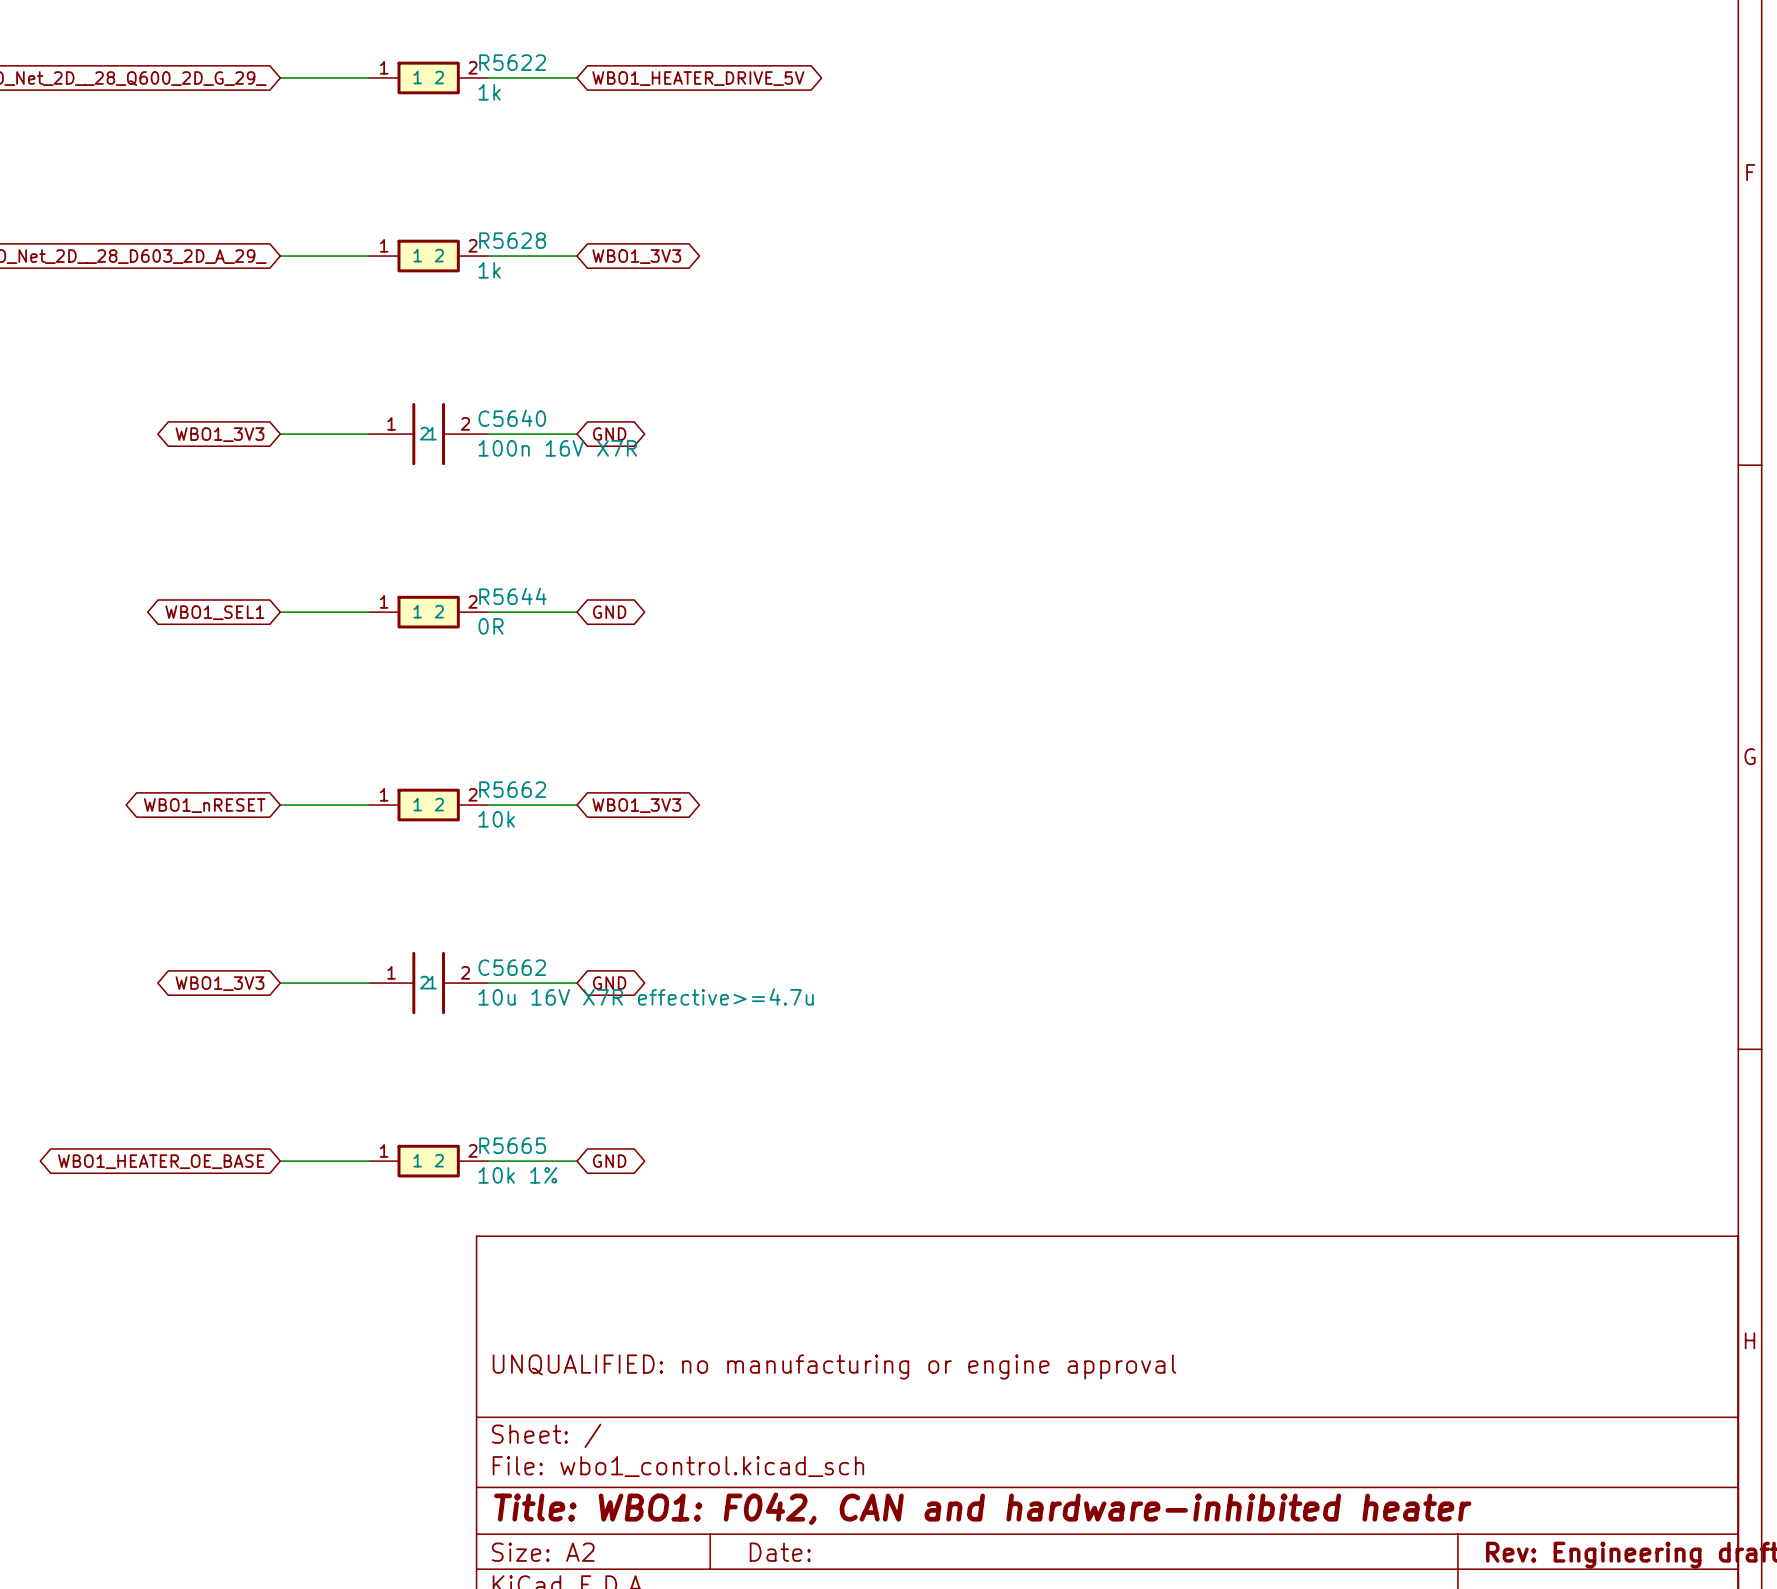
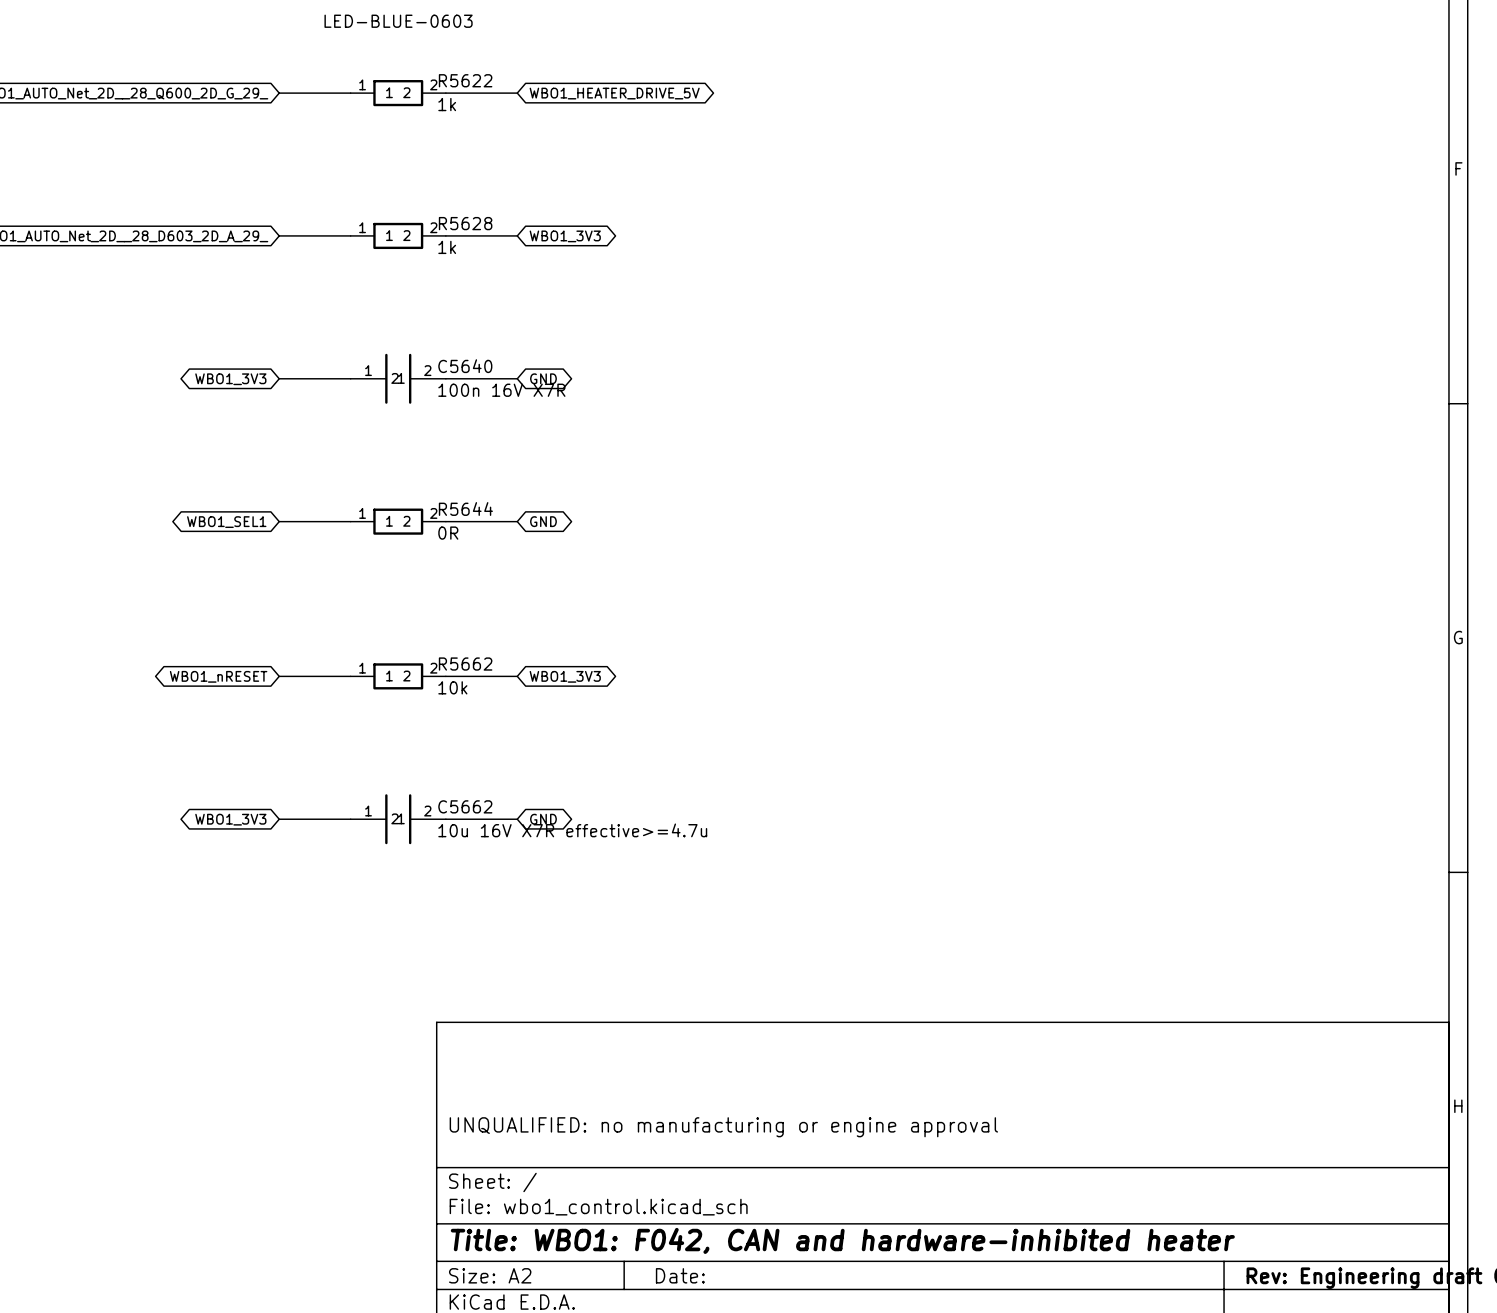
global label: WBO1_HEATER_OE_BASE (161, 1161) -> none
wire: (280, 1161) (369, 1161) -> none
R5665: 10k 1% (428, 1161) -> none
wire: (488, 1161) (577, 1161) -> none
global label: GND (609, 1161) -> none

